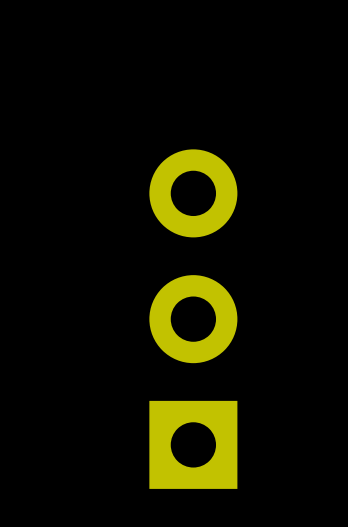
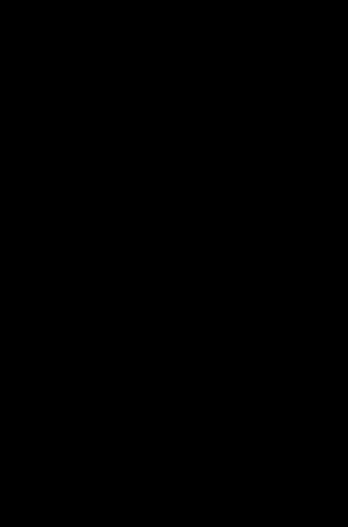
part: (193, 319) -> none

